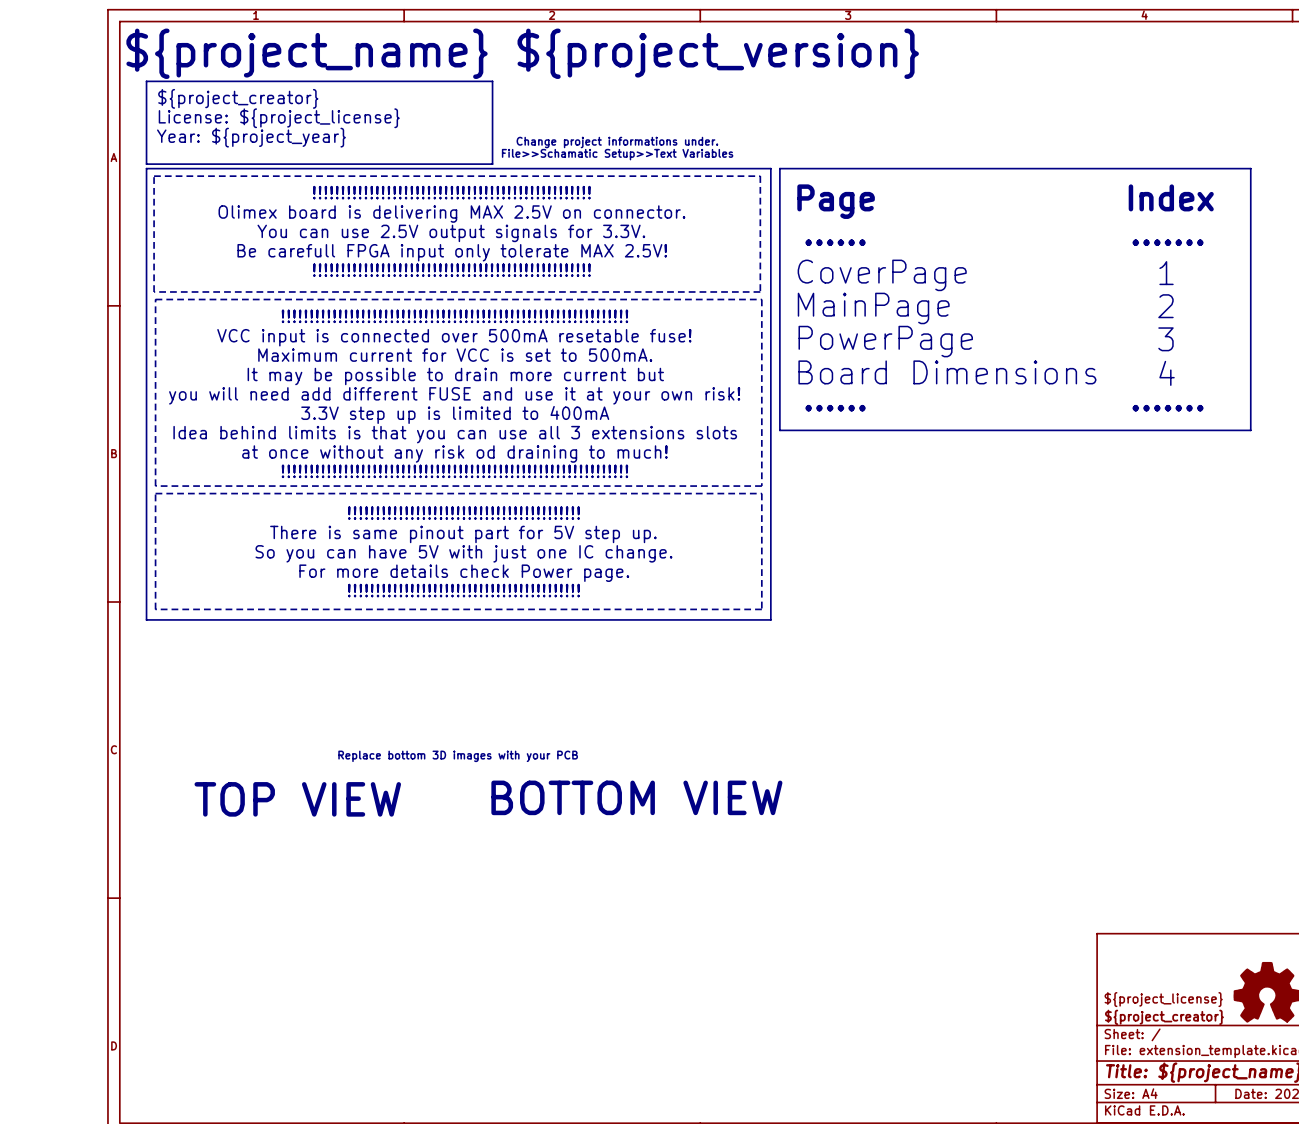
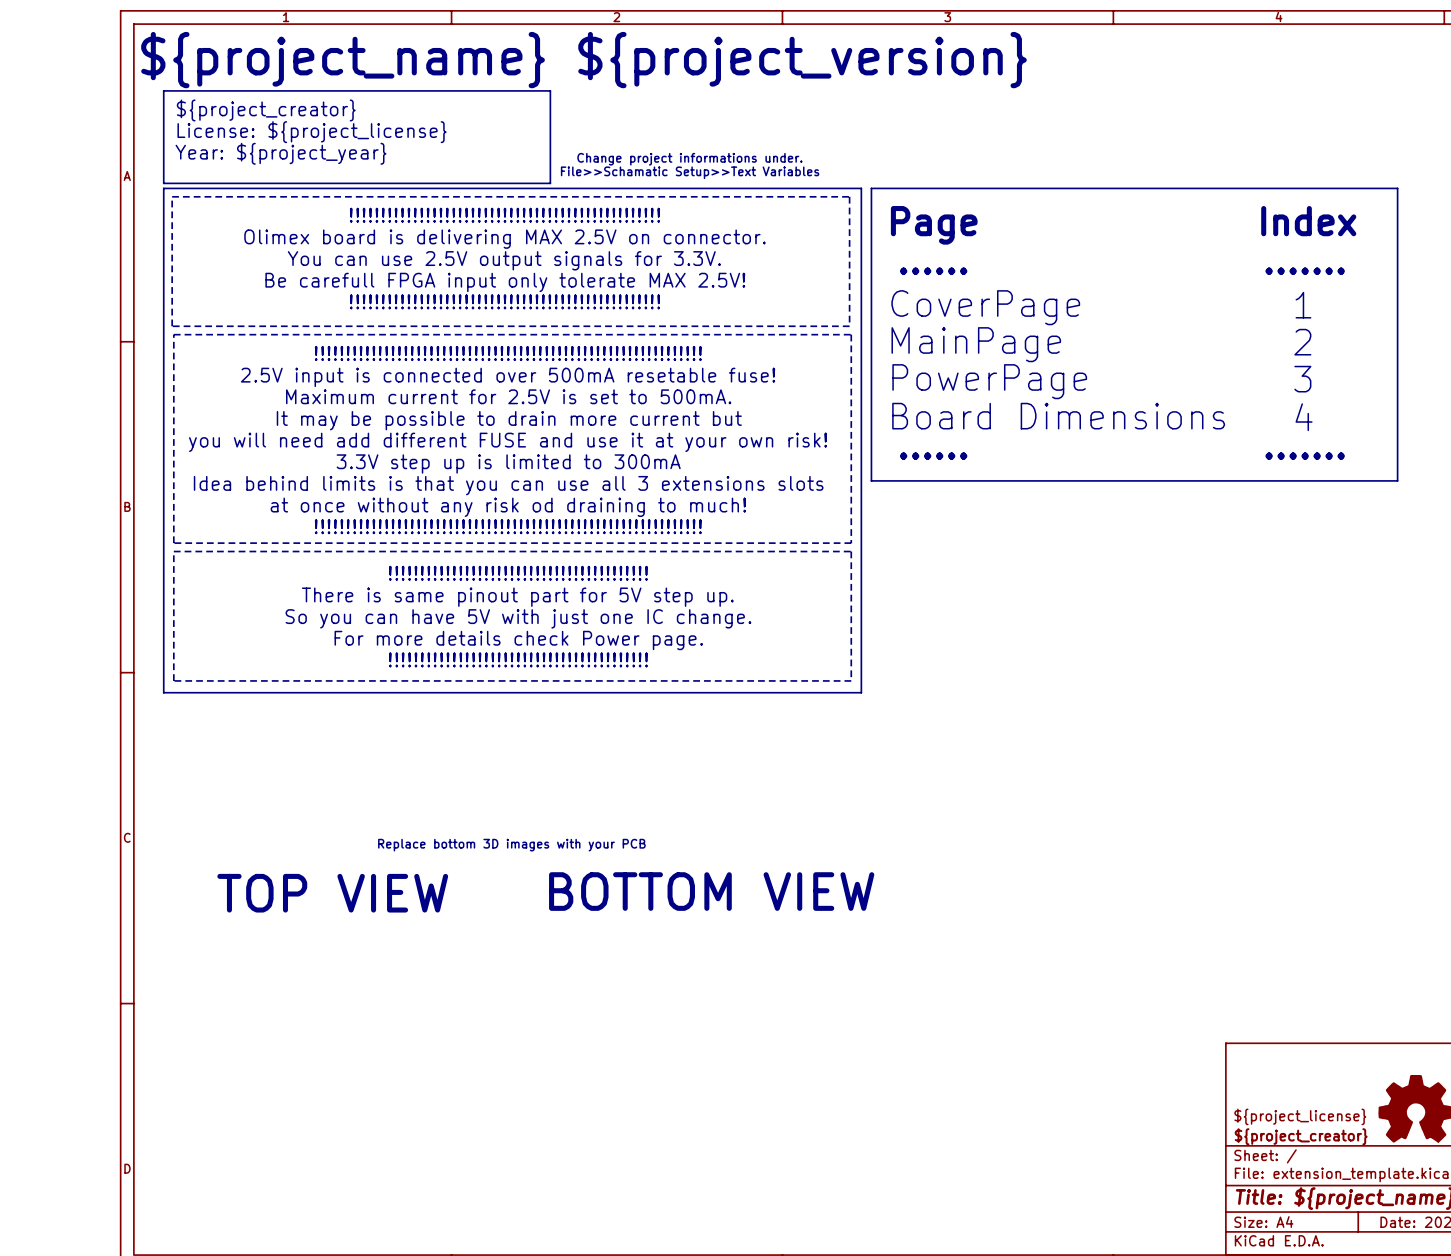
text: VCC input is connected over 500mA resetable fuse! (454, 337) -> 2.5V input is connected over 500mA resetable fuse! (508, 377)
text: Maximum current for VCC is set to 500mA. (455, 355) -> Maximum current for 2.5V is set to 500mA. (508, 396)
text: 3.3V step up is limited to 400mA (455, 414) -> 3.3V step up is limited to 300mA (508, 463)

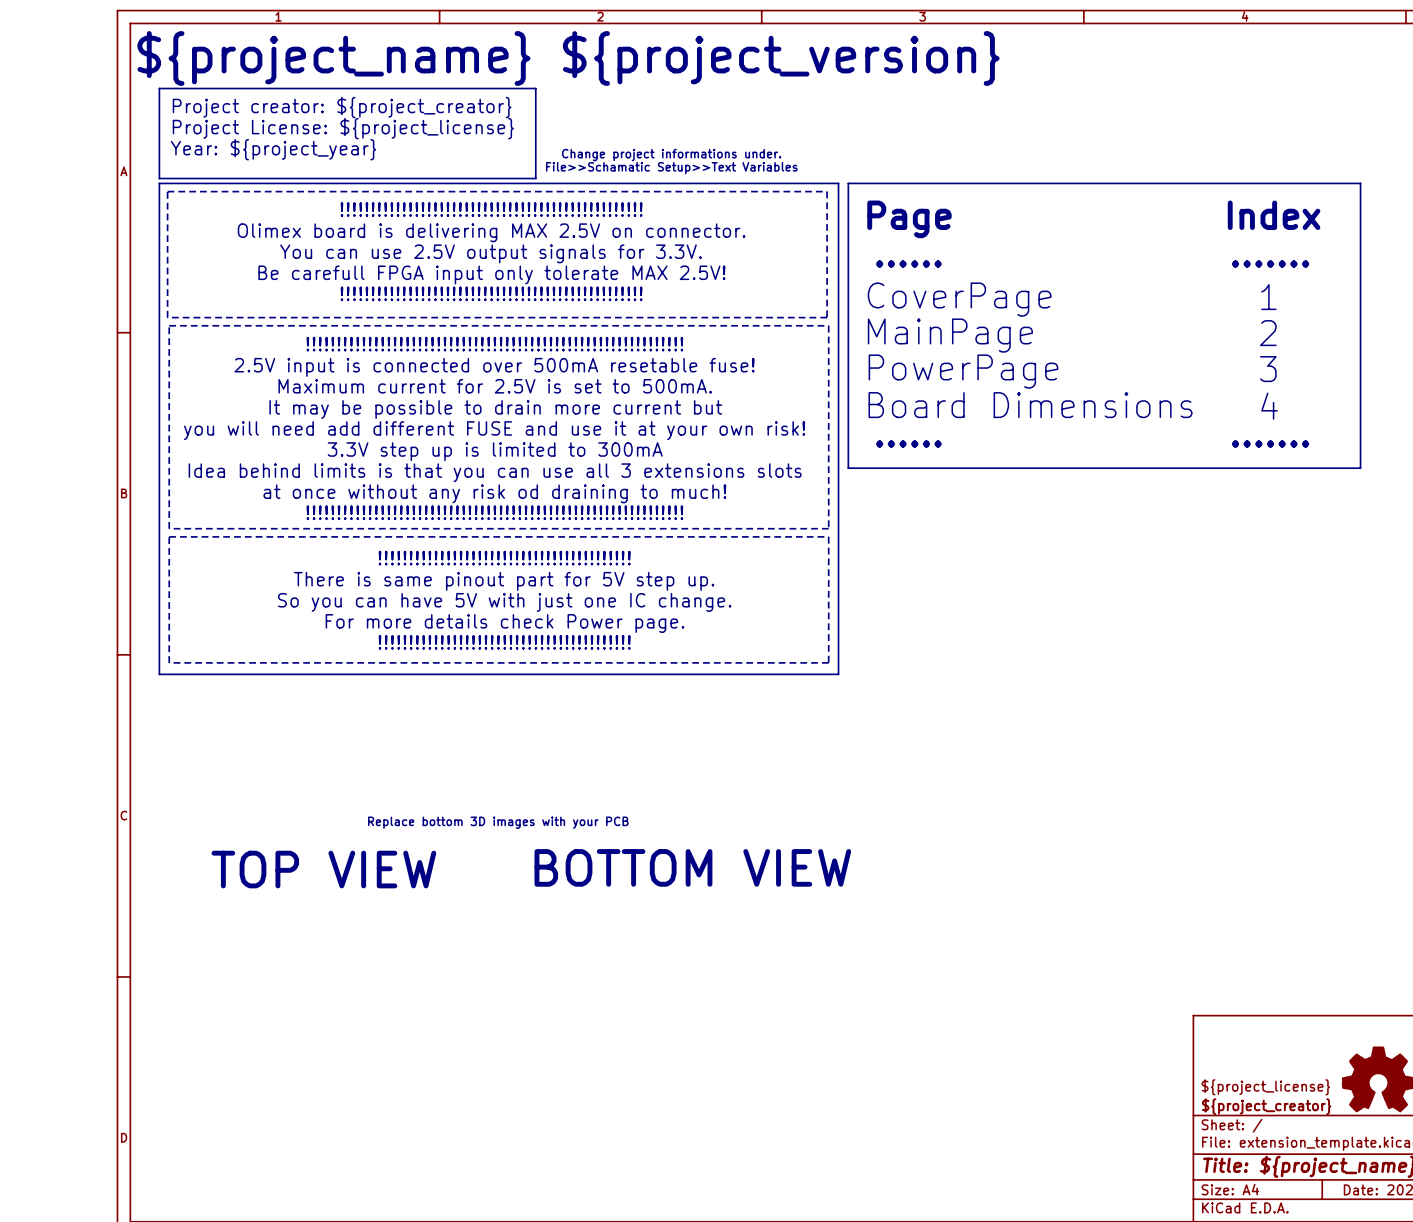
text: ${project_creator} (266, 110) -> Project creator: ${project_creator} (342, 107)
text: License: ${project_license} (312, 132) -> Project License: ${project_license} (343, 128)

